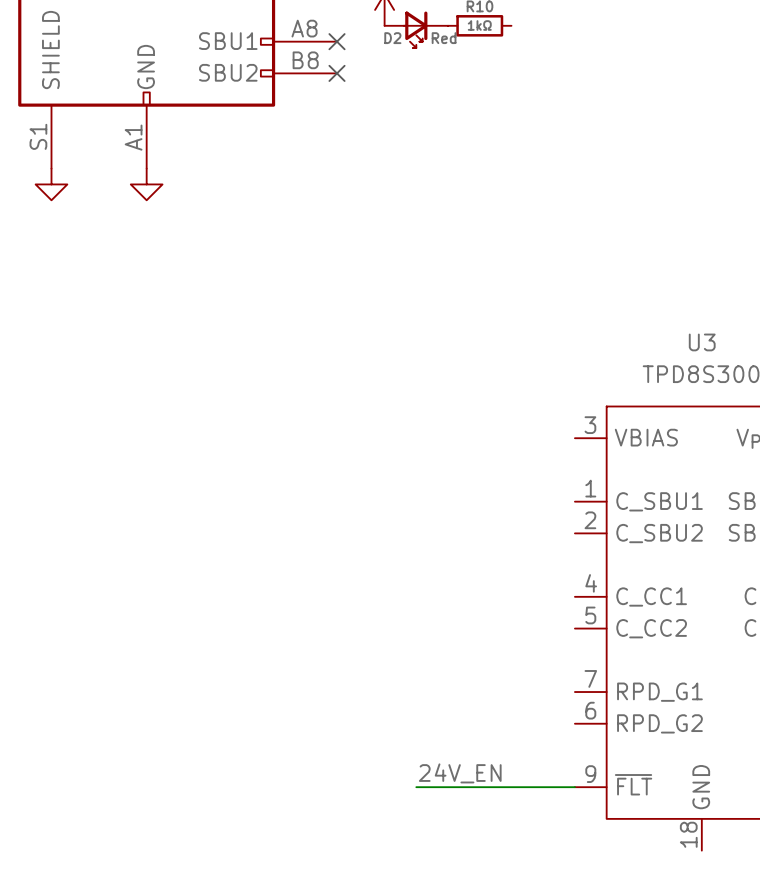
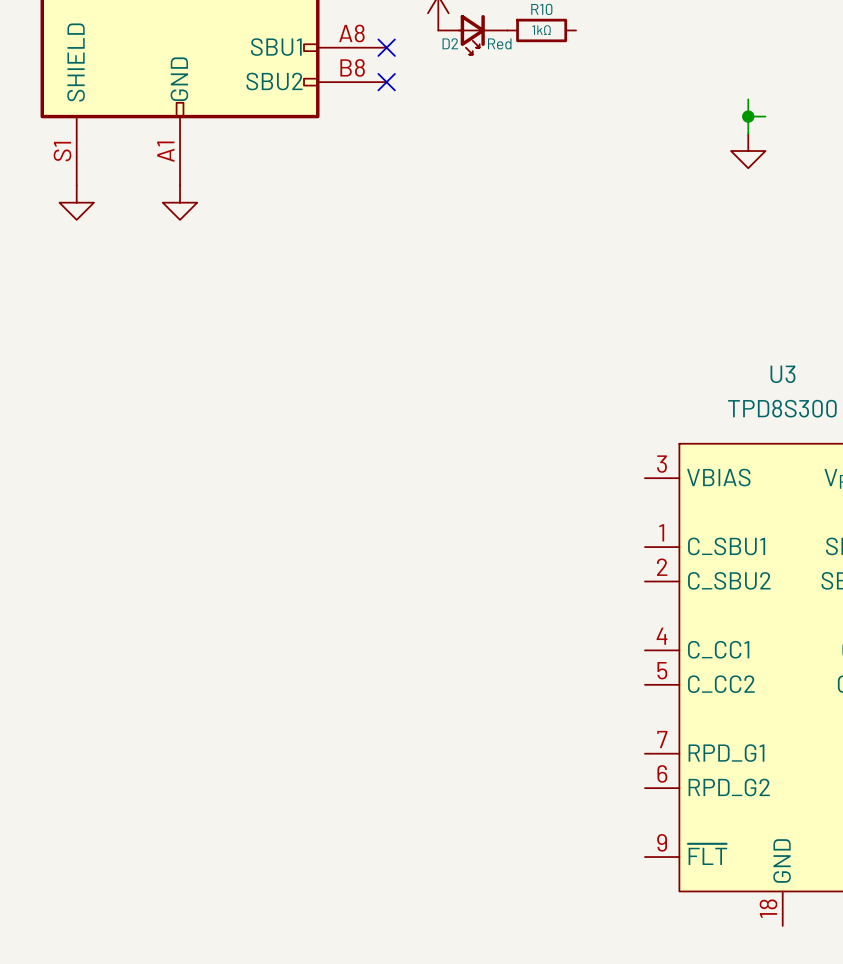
wire: none -> (748, 99) (748, 133)
wire: none -> (748, 116) (765, 116)
junction: none -> (748, 116)
power symbol: none -> (748, 151)
label: 24V_EN (460, 773) -> none
wire: (416, 787) (574, 787) -> none

